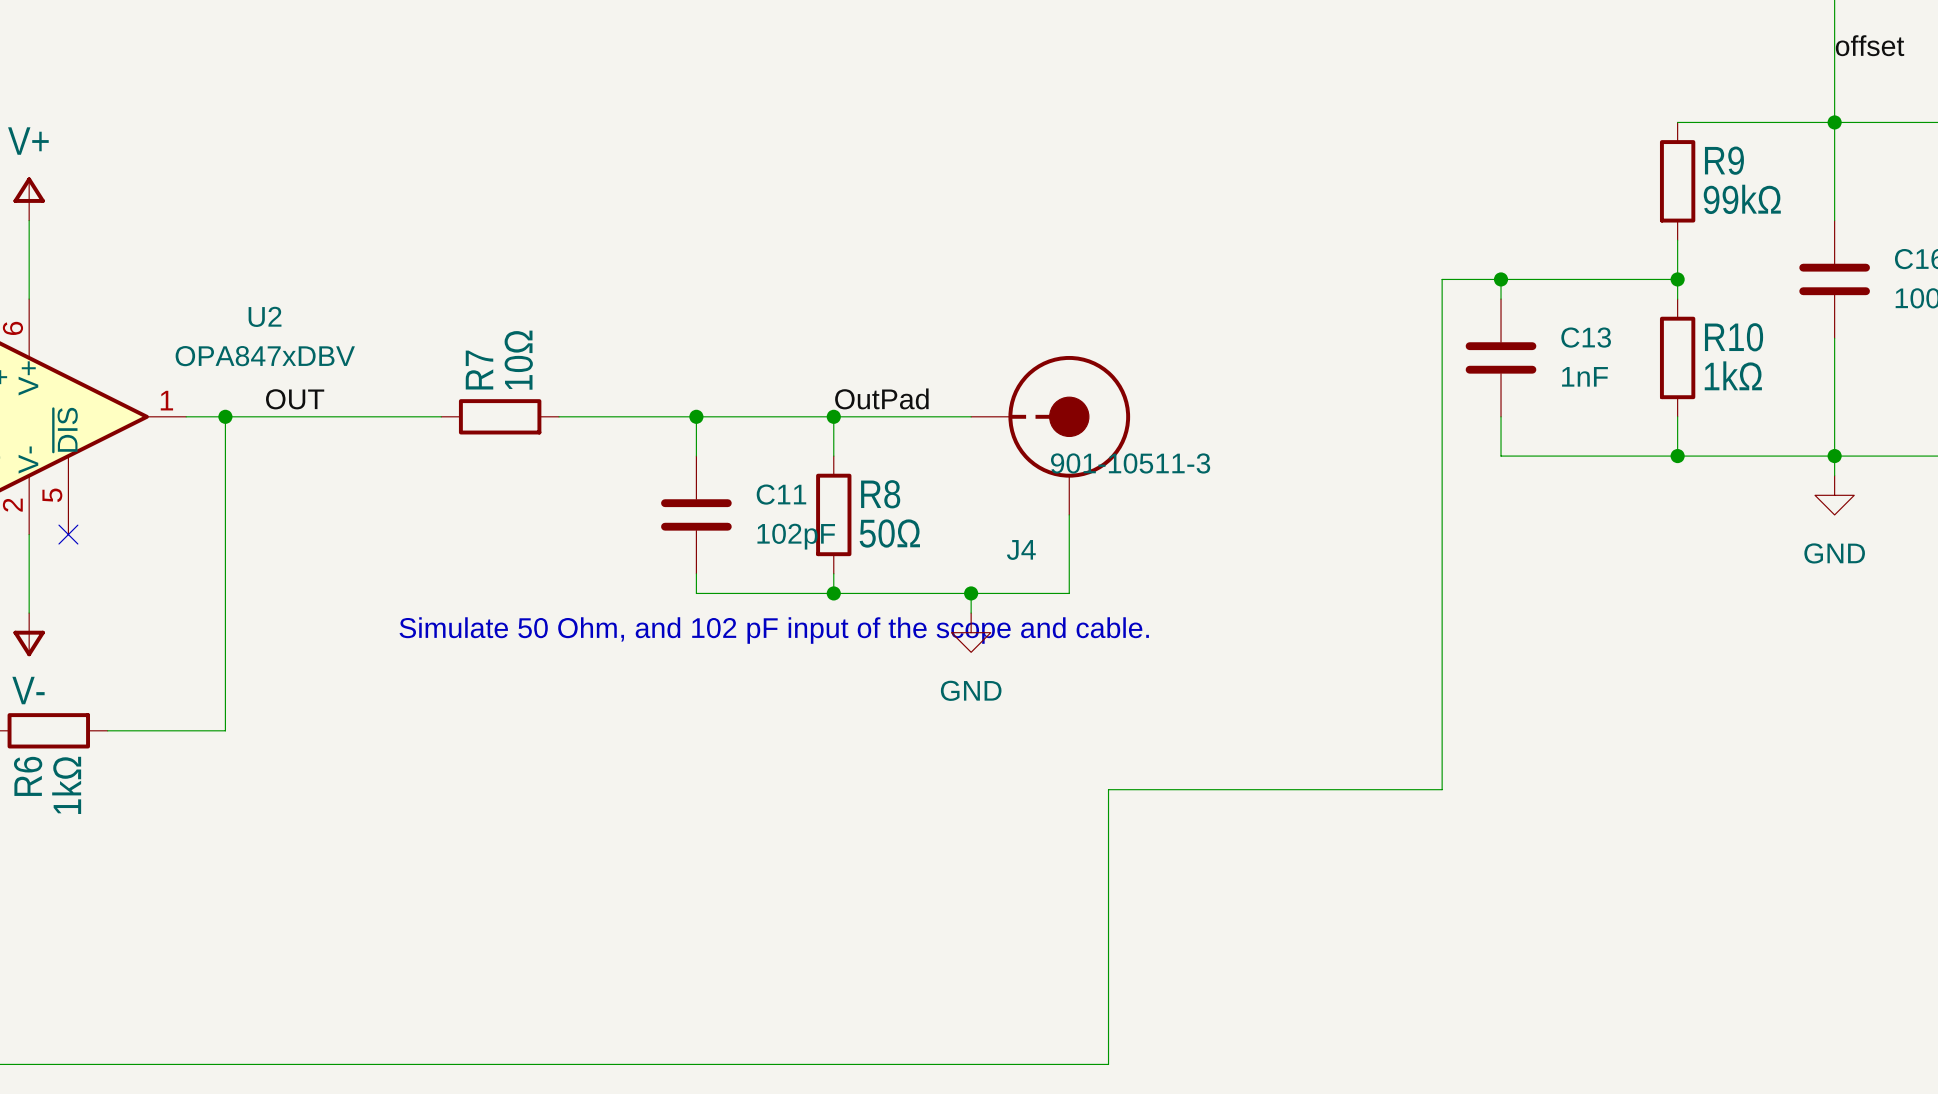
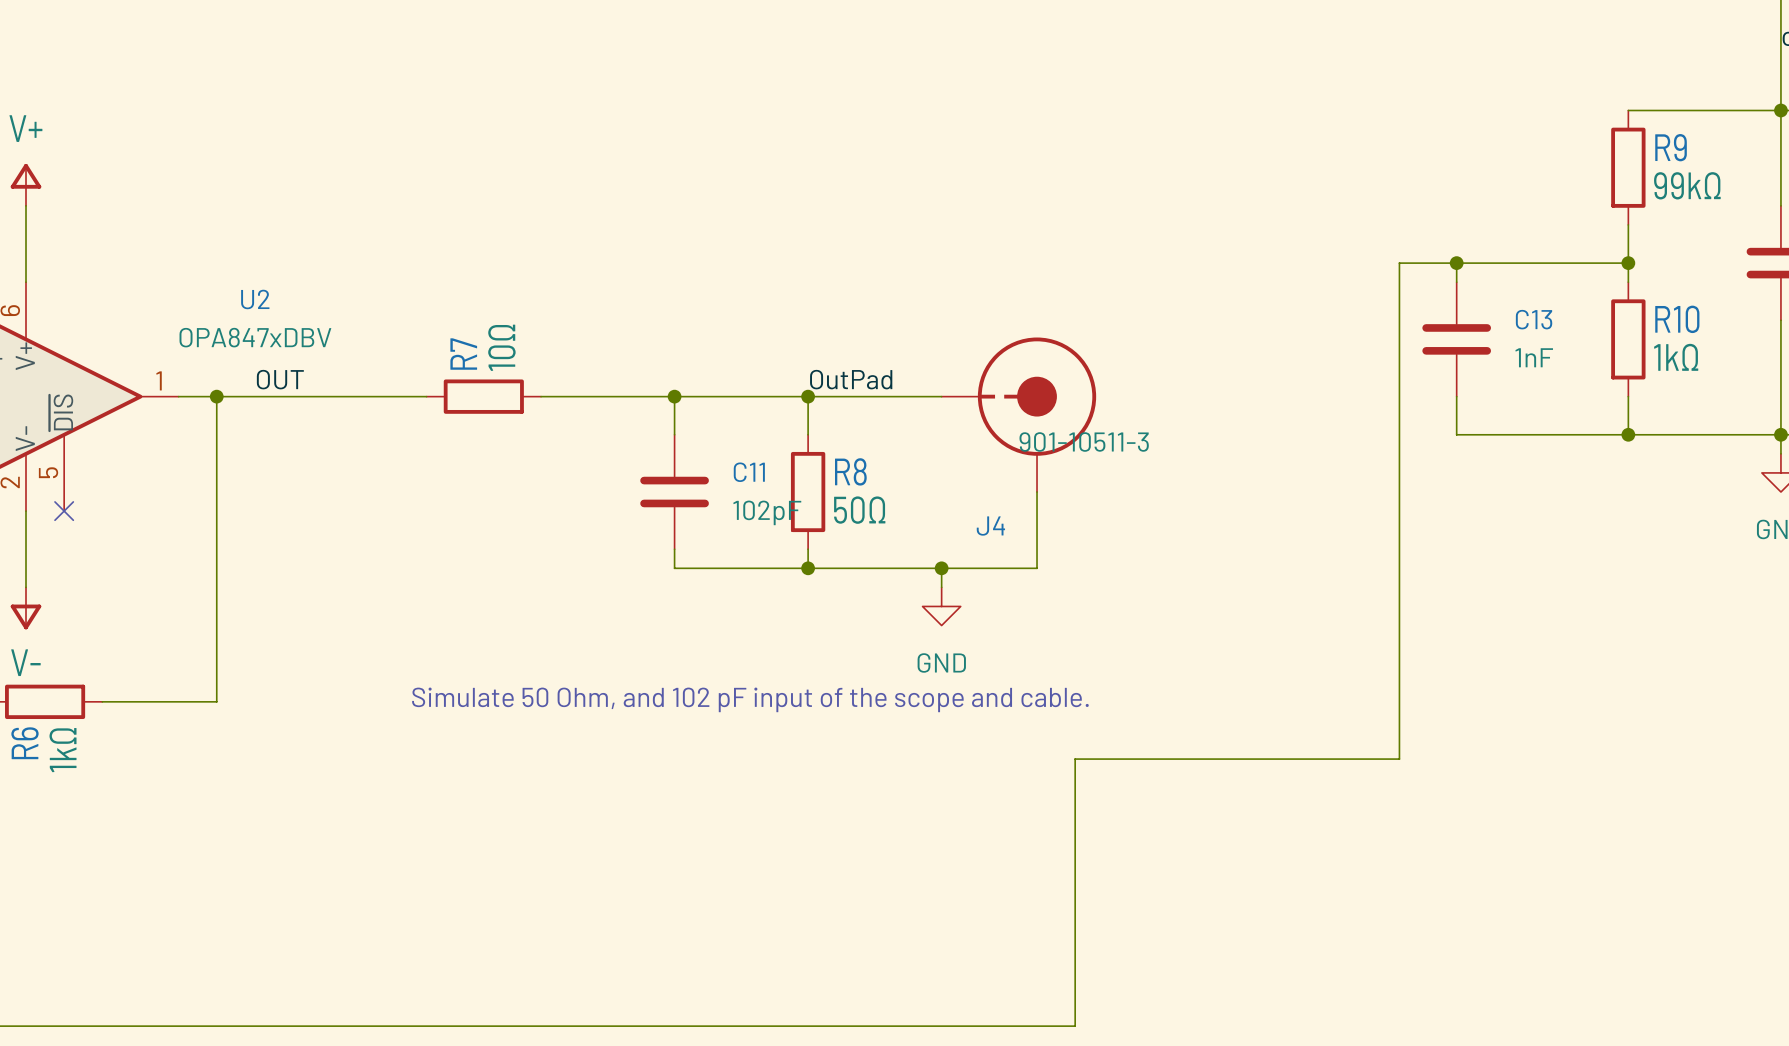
text position: Simulate 50 Ohm, and 102 pF input of the scope and cable. (774, 630) -> Simulate 50 Ohm, and 102 pF input of the scope and cable. (750, 699)

